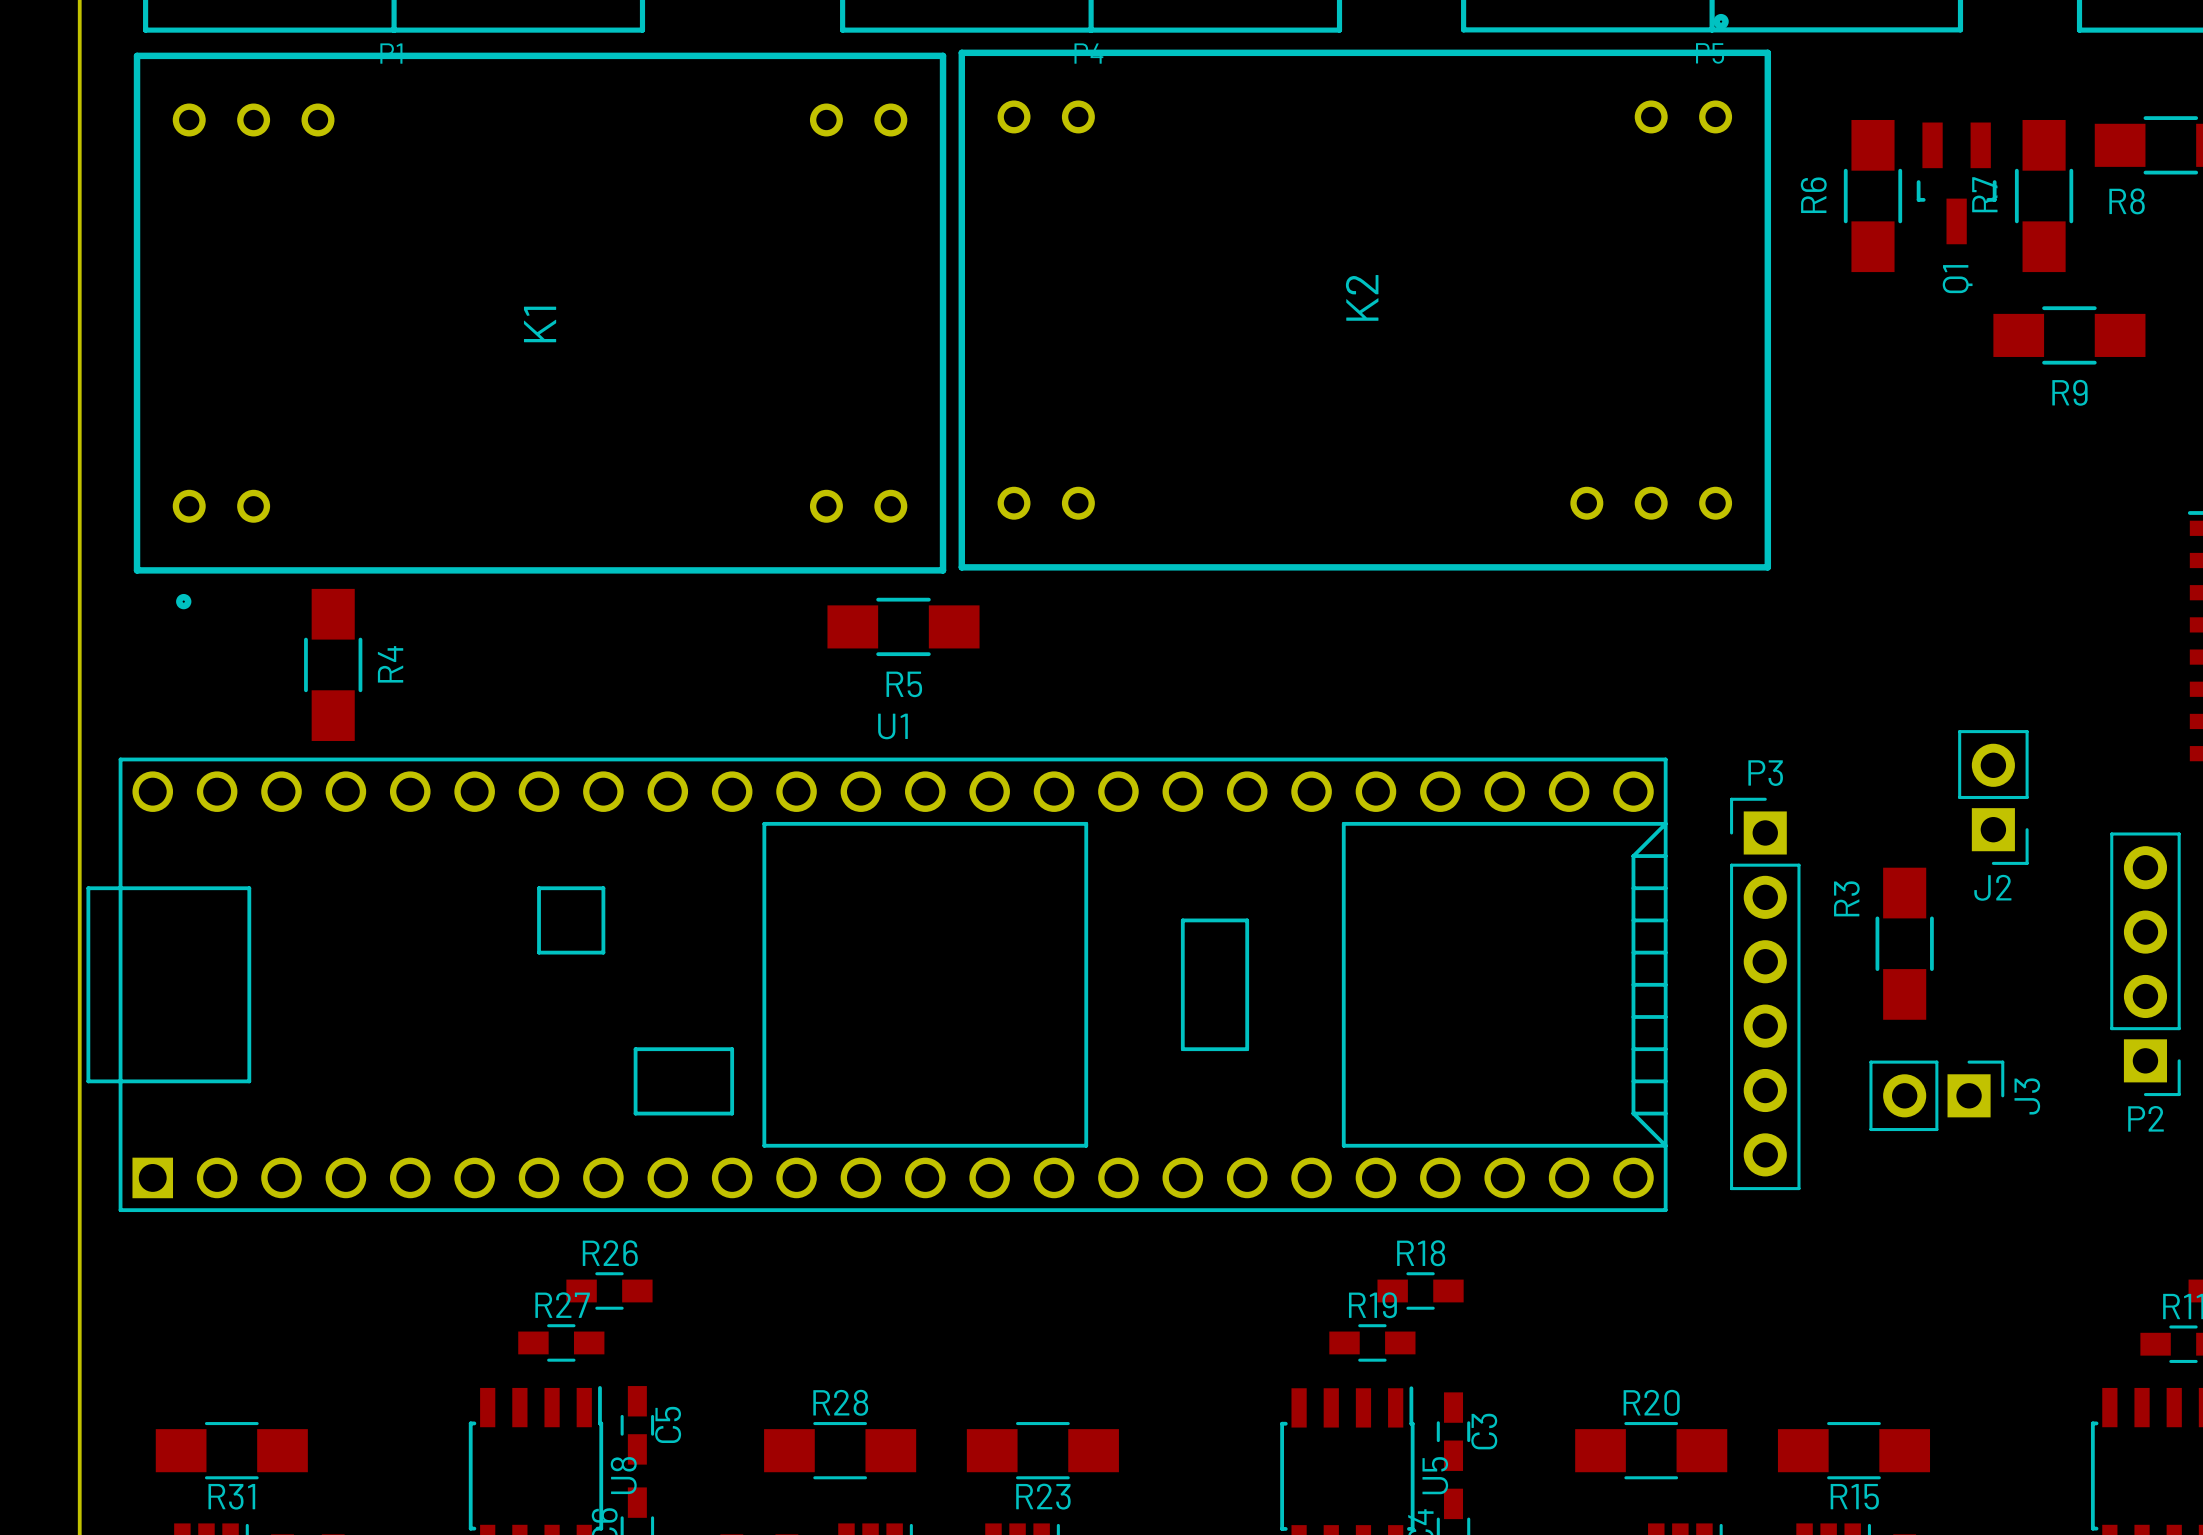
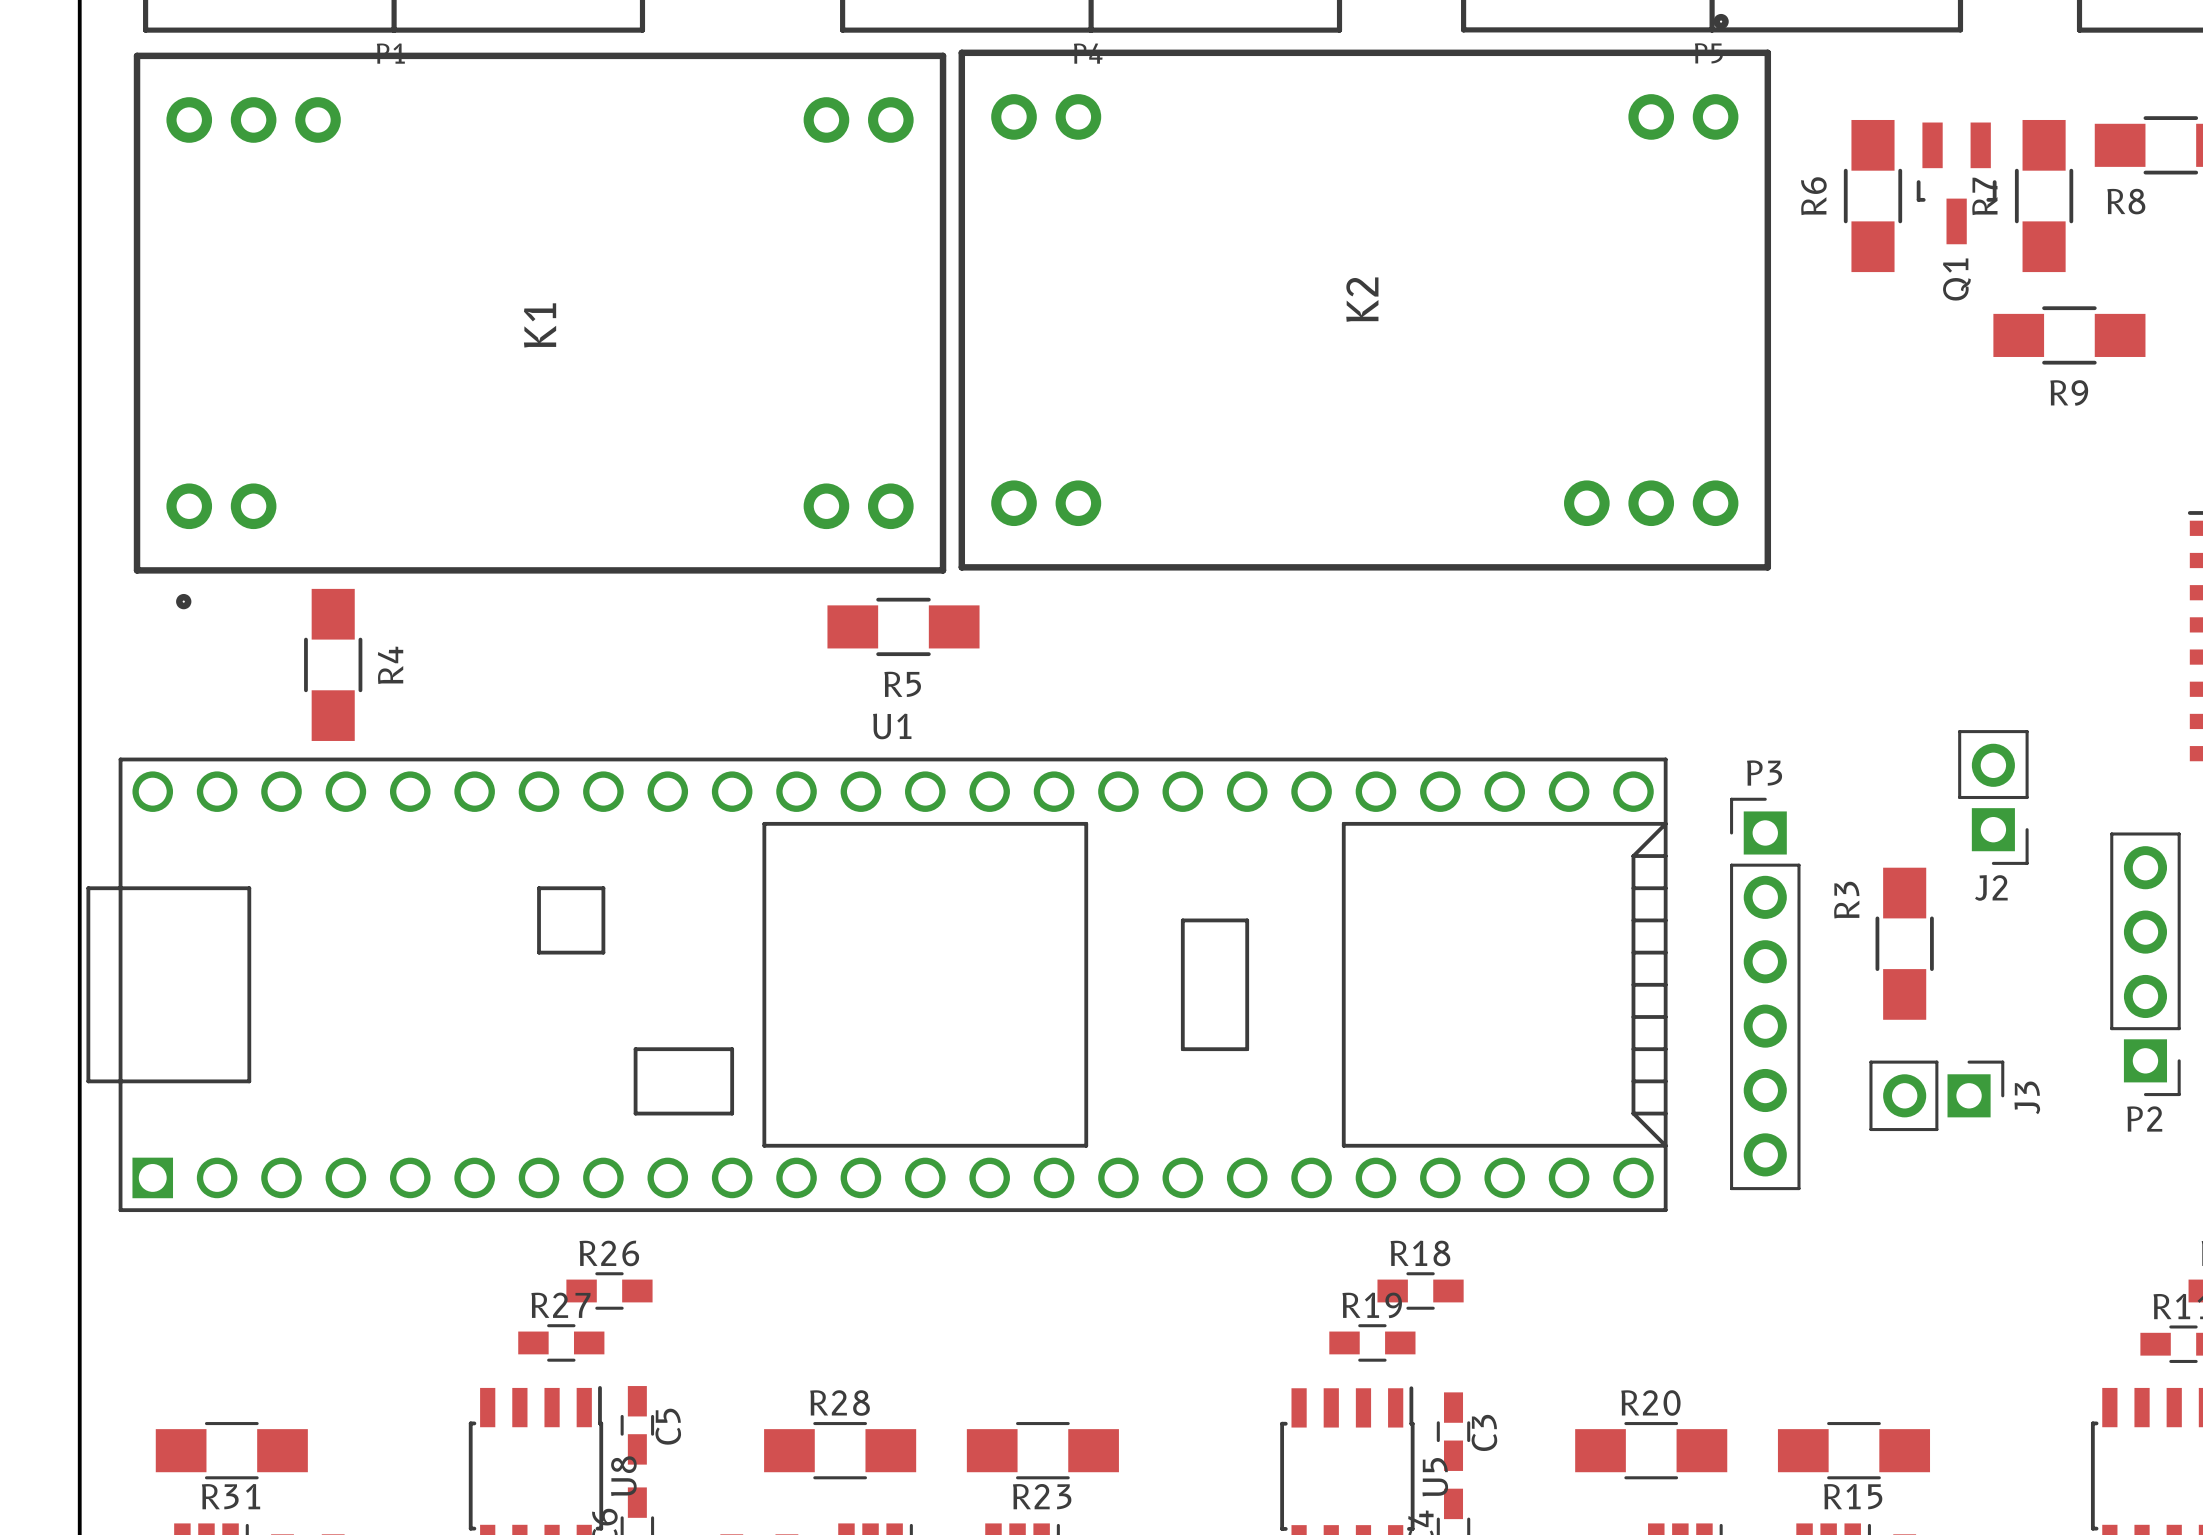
K2 footprint: [958, 13, 1772, 571] -> [958, 13, 1772, 571]
K1 footprint: [133, 52, 947, 610] -> [133, 52, 947, 610]

